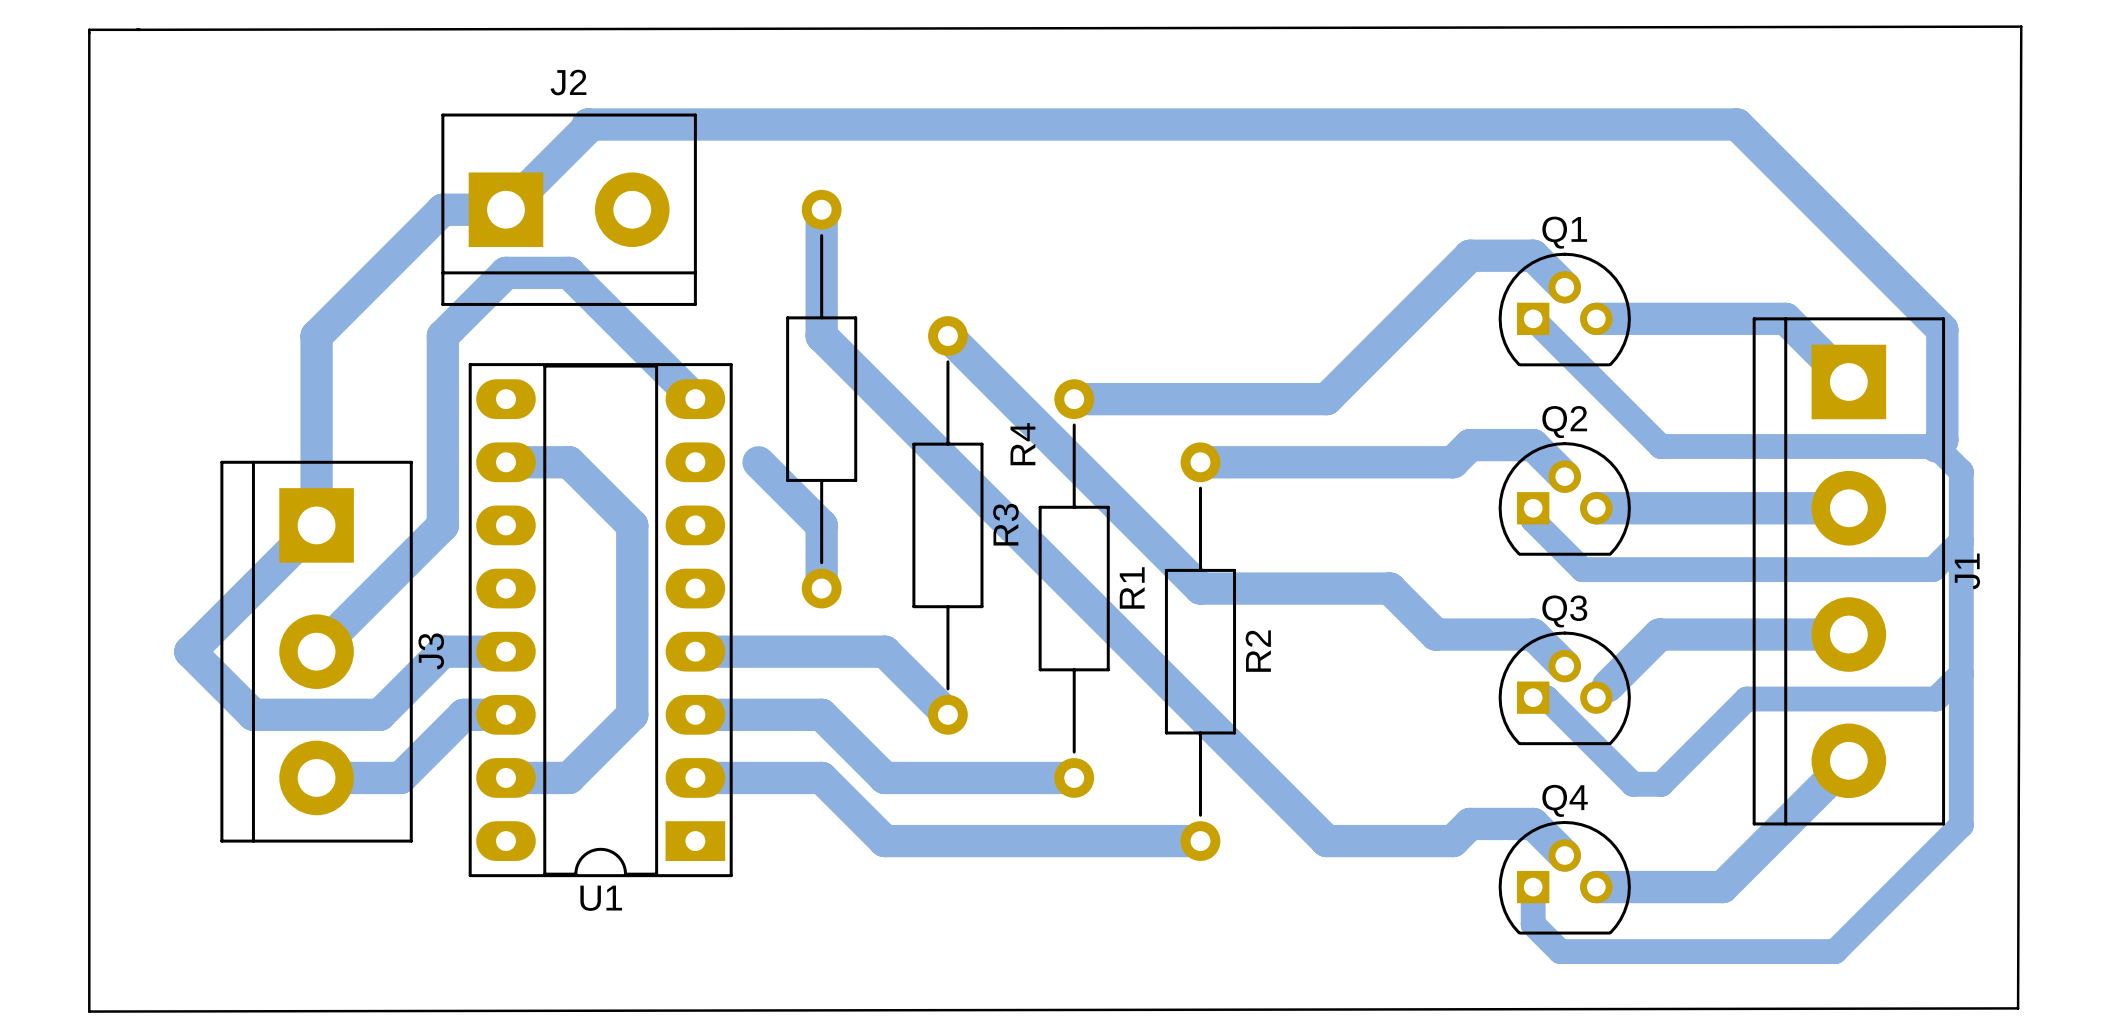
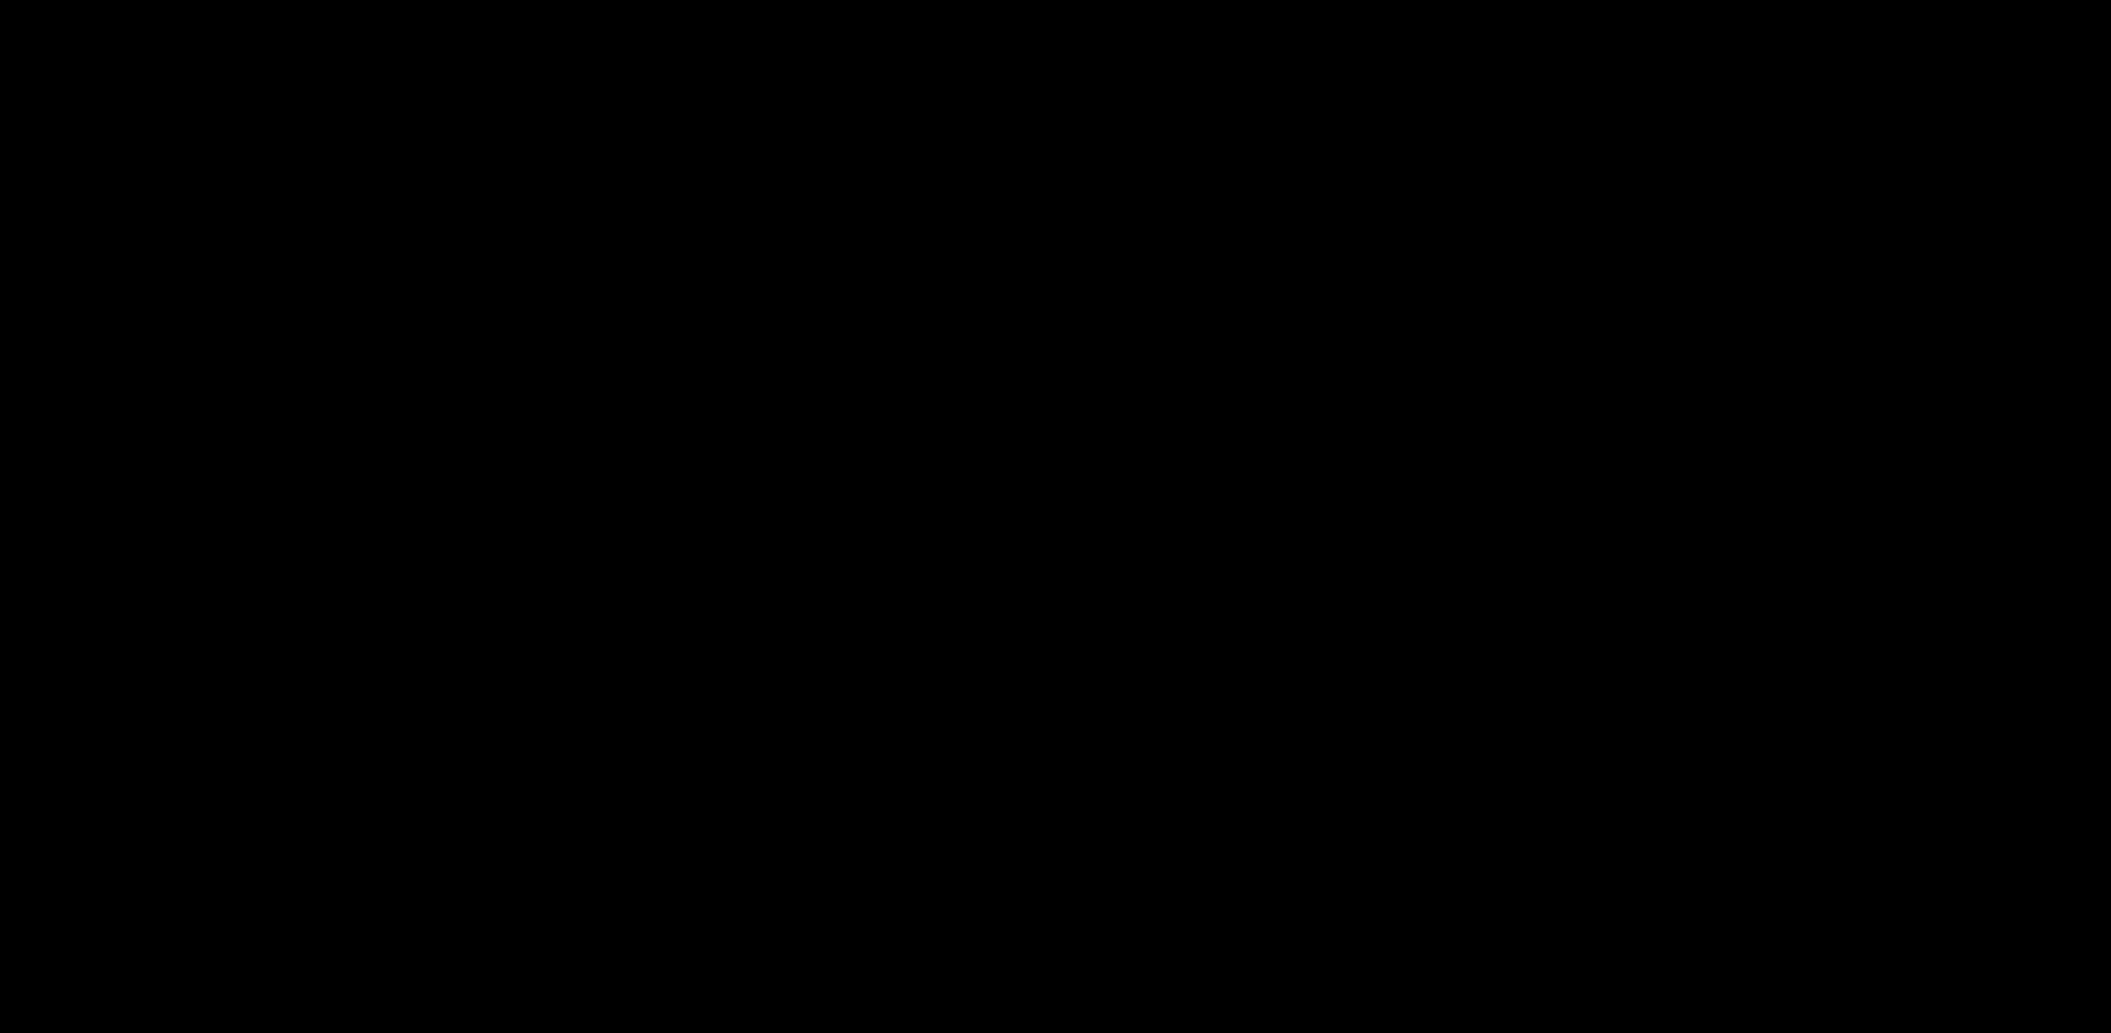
board edge: (136, 29) (2021, 26) (2018, 1008) (89, 1011) (89, 29) (139, 29) -> none
J2: (569, 209) -> none
bottom track: (821, 209) (821, 336) (1326, 841) (1452, 841) (1470, 823) (1533, 823) (1564, 855) -> none
bottom track: (1564, 287) (1533, 255) (1470, 255) (1326, 399) (1074, 399) -> none
Q1: (1564, 309) -> none
bottom track: (1533, 318) (1660, 446) (1936, 446) -> none
bottom track: (1596, 318) (1785, 318) (1848, 381) -> none
bottom track: (947, 336) (1200, 588) (1389, 588) (1435, 634) (1533, 634) (1564, 666) -> none
bottom track: (695, 399) (569, 272) (505, 272) (442, 336) (442, 525) (316, 651) -> none
R4: (821, 399) -> none
bottom track: (1936, 446) (1942, 440) (1942, 329) (1737, 124) (588, 124) (588, 127) (505, 209) (442, 209) (316, 336) (316, 525) (190, 651) (253, 714) (379, 714) (442, 651) (505, 651) -> none
bottom track: (1936, 446) (1961, 471) (1961, 825) (1835, 951) (1560, 951) (1533, 924) (1533, 887) -> none
bottom track: (505, 462) (569, 462) (632, 525) (632, 714) (569, 777) (505, 777) -> none
bottom track: (758, 462) (821, 525) (821, 588) -> none
bottom track: (1200, 462) (1452, 462) (1470, 445) (1533, 445) (1564, 476) -> none
Q2: (1564, 498) -> none
bottom track: (1533, 508) (1533, 520) (1582, 569) (1932, 569) (1961, 541) -> none
bottom track: (1596, 508) (1848, 508) -> none
R3: (947, 525) -> none
J1: (1848, 571) -> none
R1: (1074, 588) -> none
U1: (600, 620) -> none
bottom track: (1848, 634) (1659, 634) (1607, 686) -> none
J3: (316, 651) -> none
bottom track: (695, 651) (884, 651) (947, 714) -> none
R2: (1200, 651) -> none
bottom track: (1961, 673) (1936, 699) (1746, 699) (1661, 784) (1632, 784) (1546, 697) (1533, 697) -> none
Q3: (1564, 688) -> none
bottom track: (505, 714) (463, 714) (400, 777) (316, 777) -> none
bottom track: (695, 714) (821, 714) (884, 777) (1074, 777) -> none
bottom track: (1848, 760) (1722, 887) (1596, 887) -> none
bottom track: (695, 777) (821, 777) (884, 841) (1200, 841) -> none
Q4: (1564, 877) -> none

